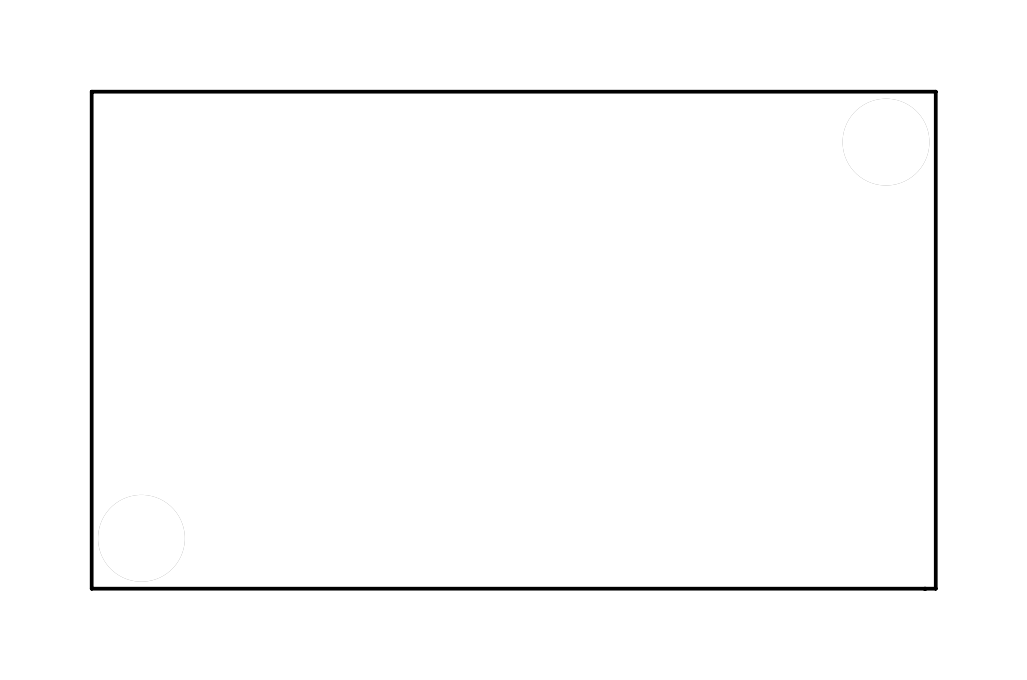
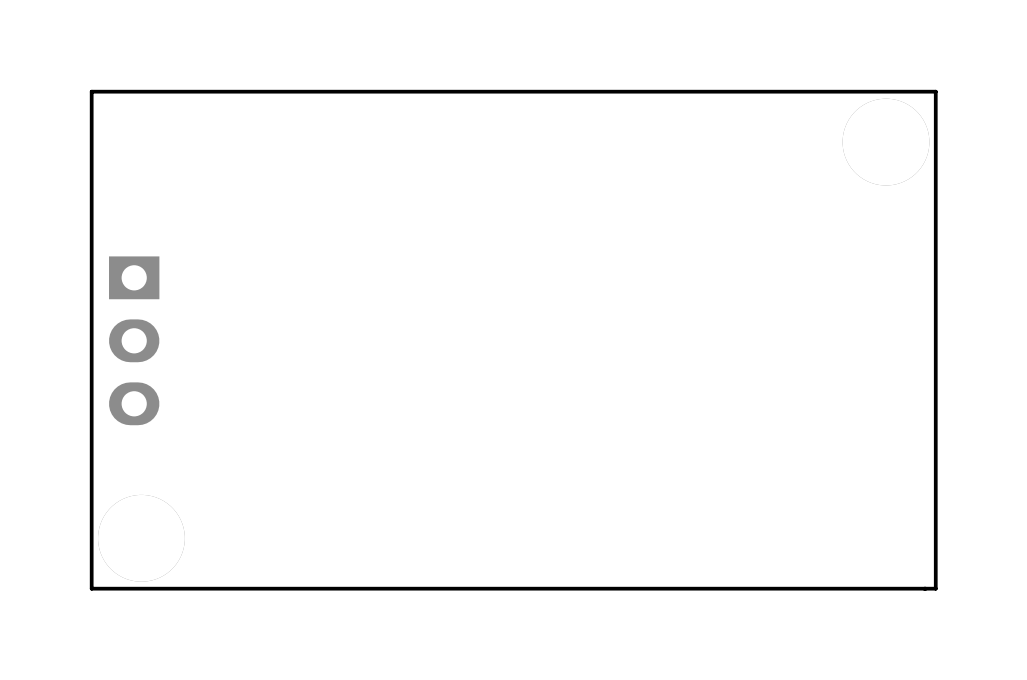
part: none -> (134, 340)

